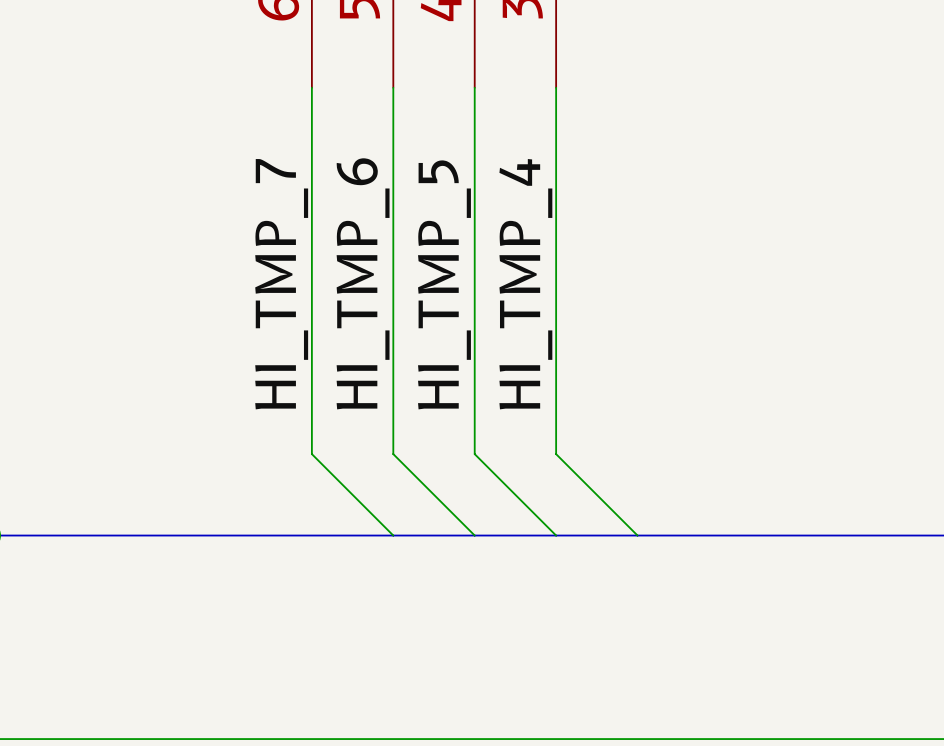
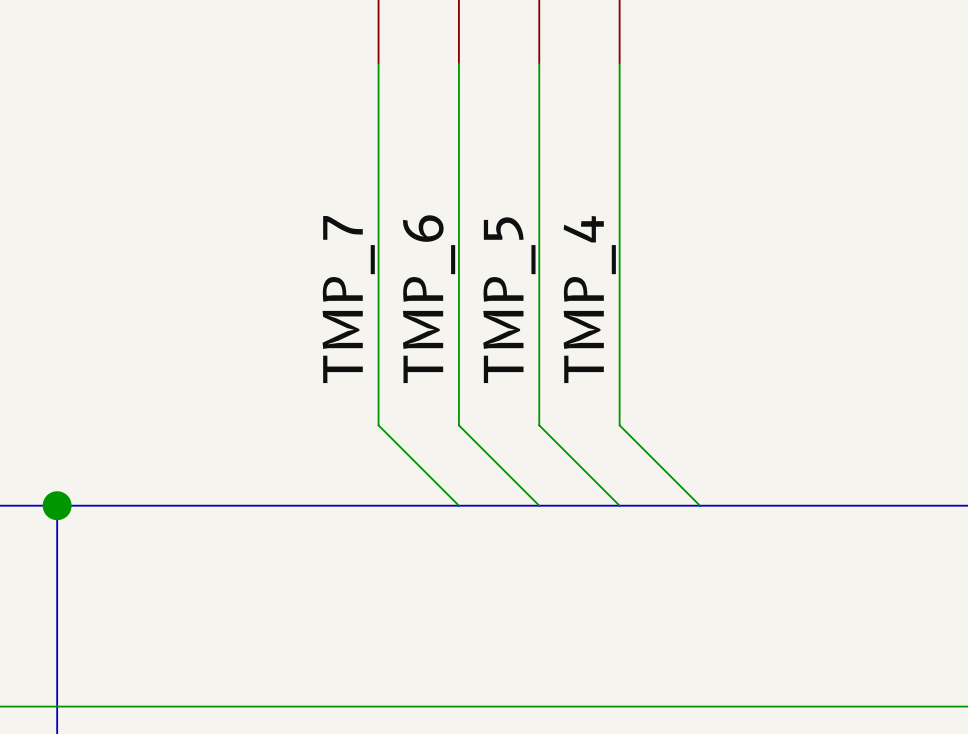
label: HI_TMP_6 (363, 283) -> TMP_6 (429, 299)
label: HI_TMP_7 (281, 284) -> TMP_7 (348, 299)
label: HI_TMP_5 (444, 284) -> TMP_5 (509, 300)
label: HI_TMP_4 (525, 284) -> TMP_4 (589, 299)

